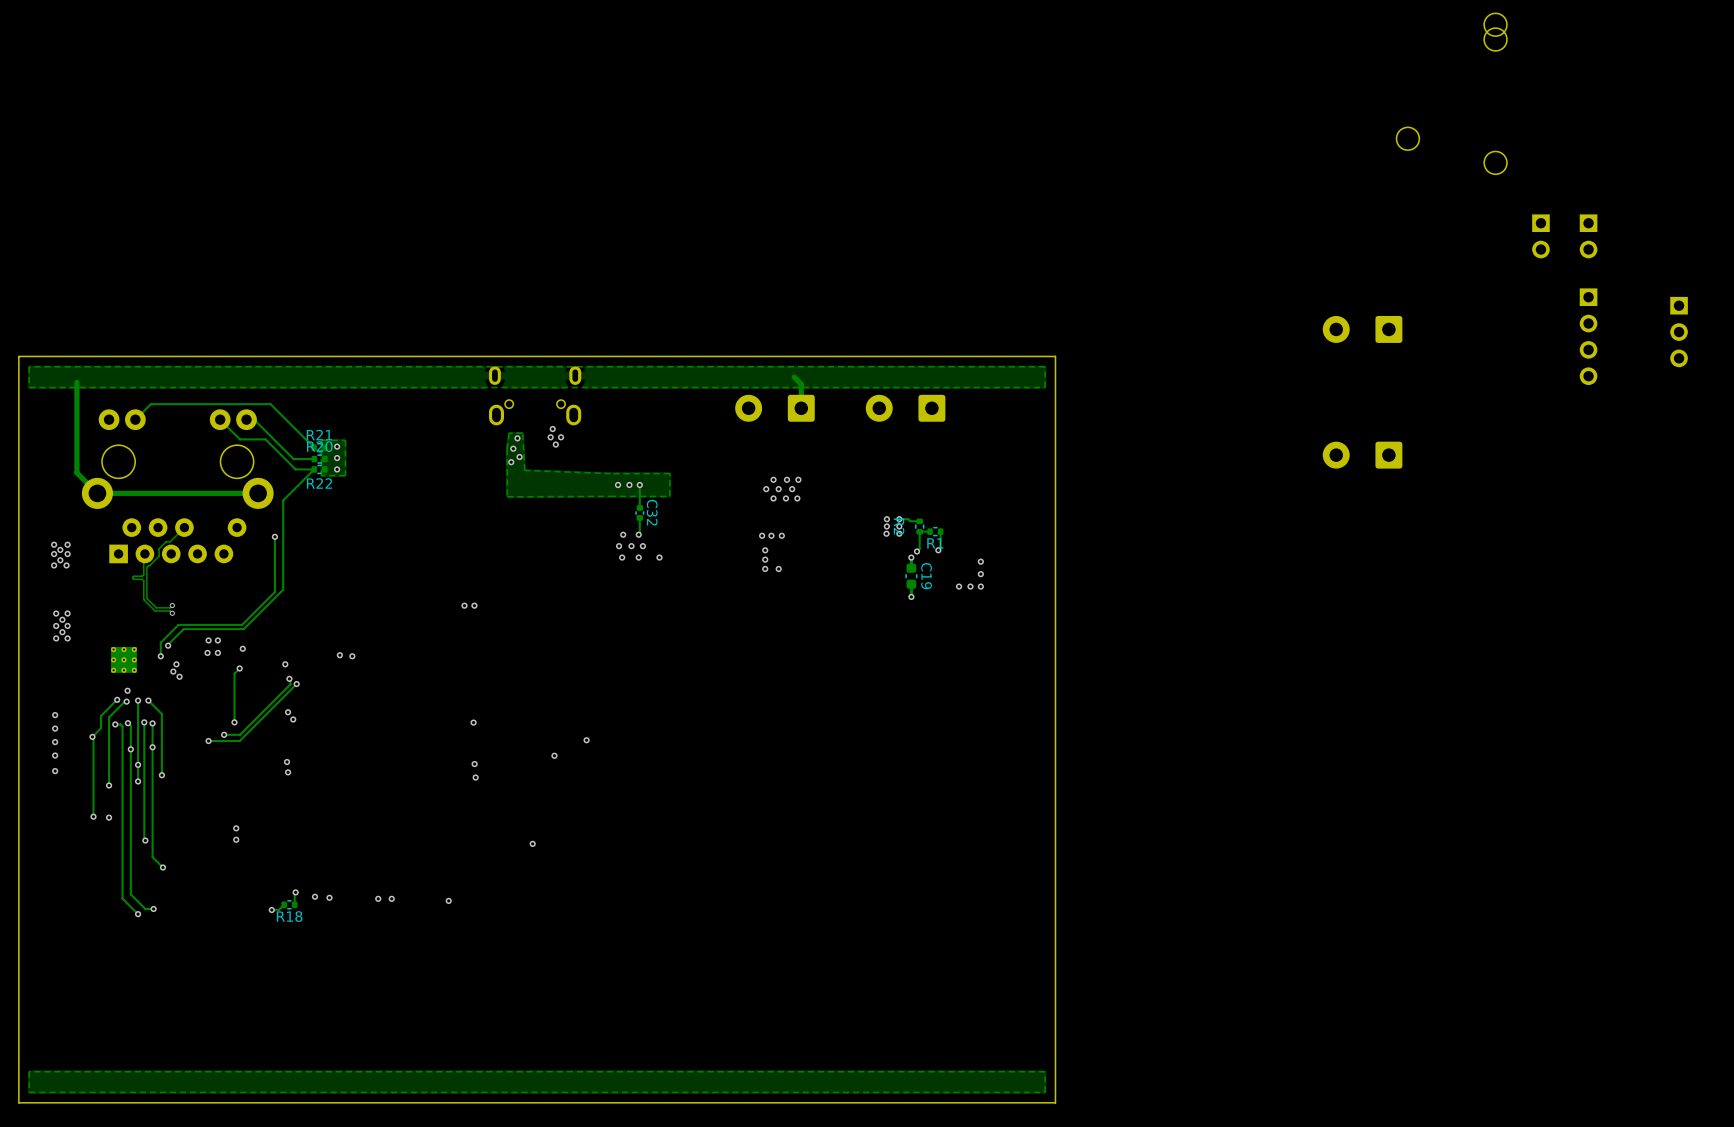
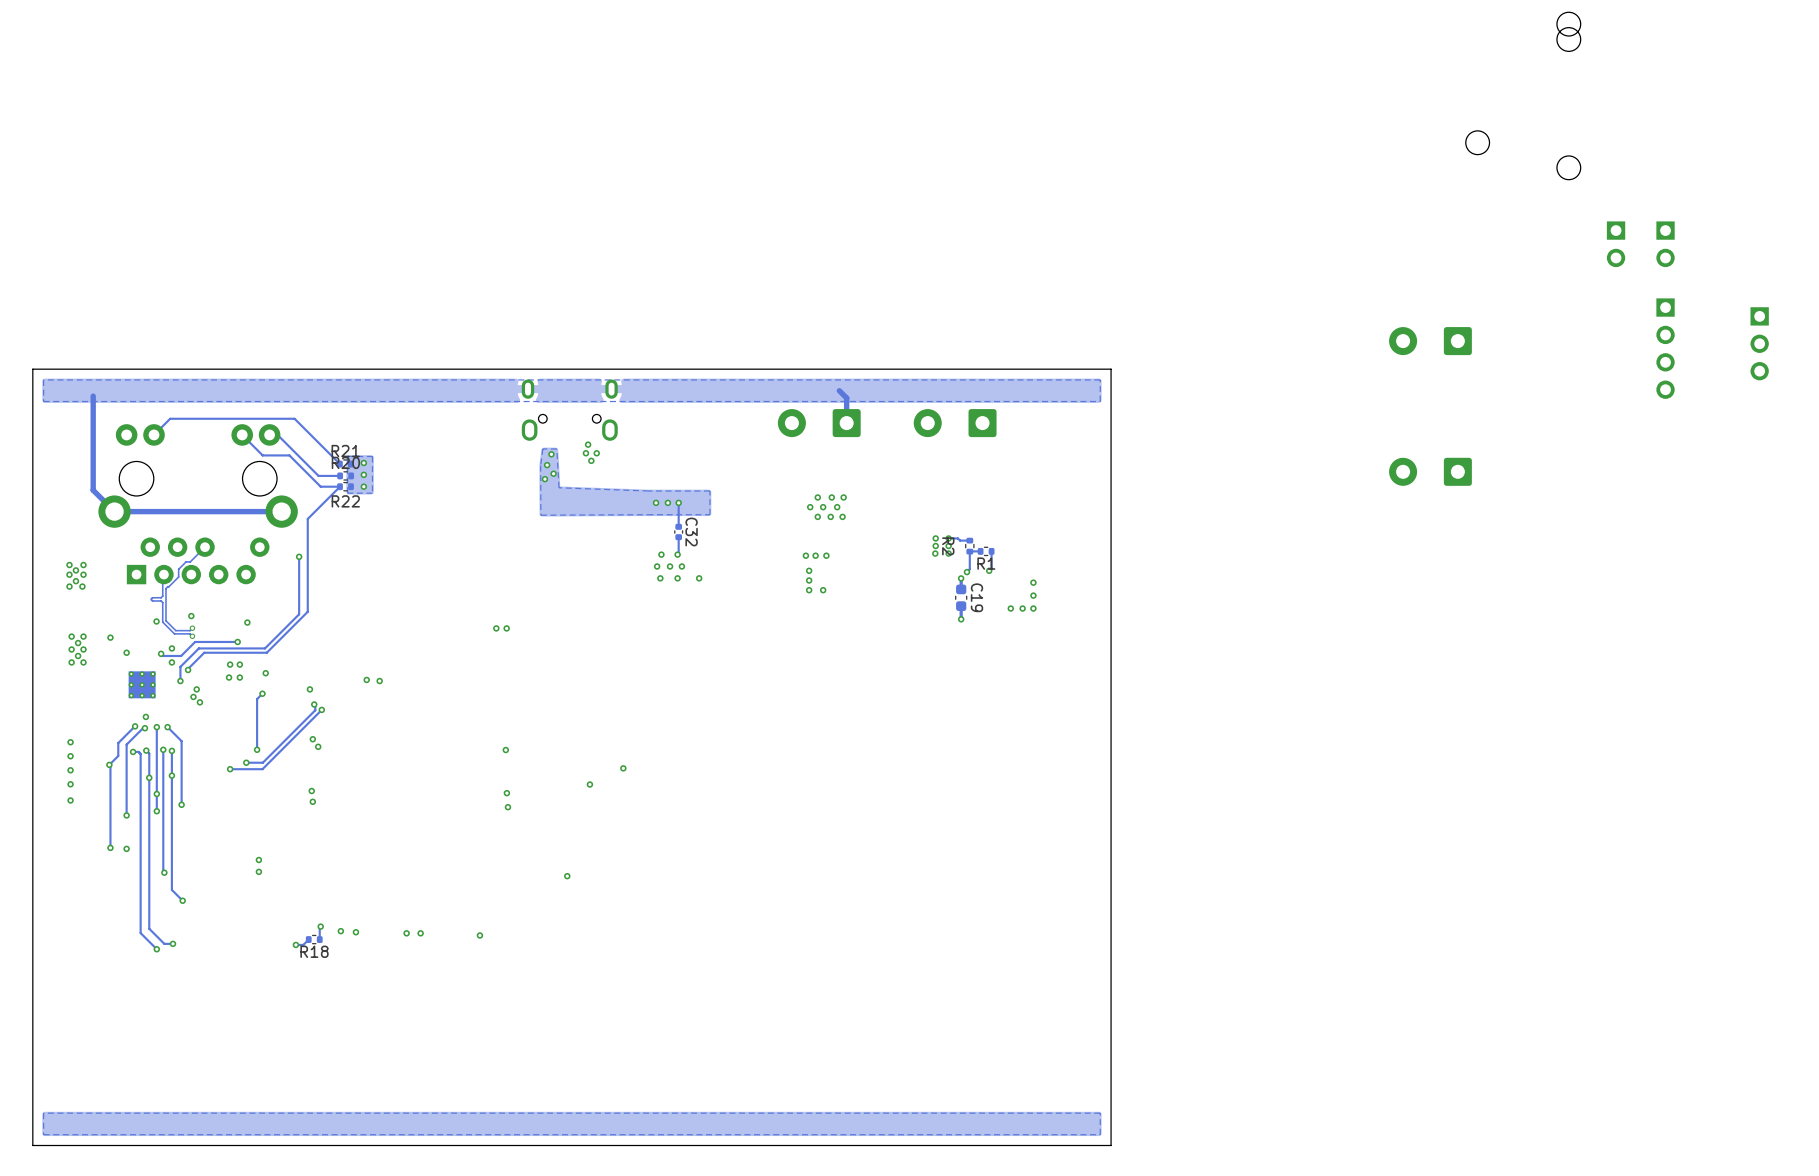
via: none -> (191, 616)
via: none -> (156, 621)
via: none -> (247, 622)
via: none -> (110, 637)
track: none -> (237, 641) (195, 641) (181, 655) (163, 655) (161, 653)
via: none -> (237, 641)
via: none -> (171, 648)
via: none -> (126, 652)
via: none -> (161, 653)
via: none -> (171, 662)

